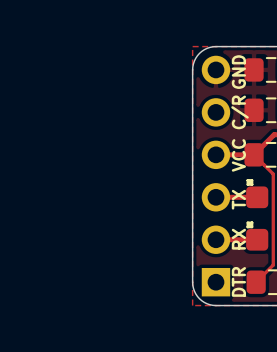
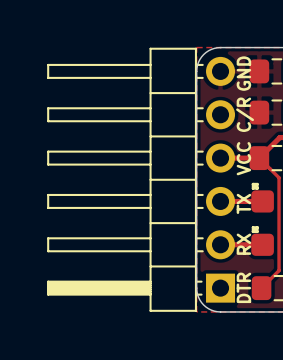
part side: bottom (215, 176) -> top (141, 179)

